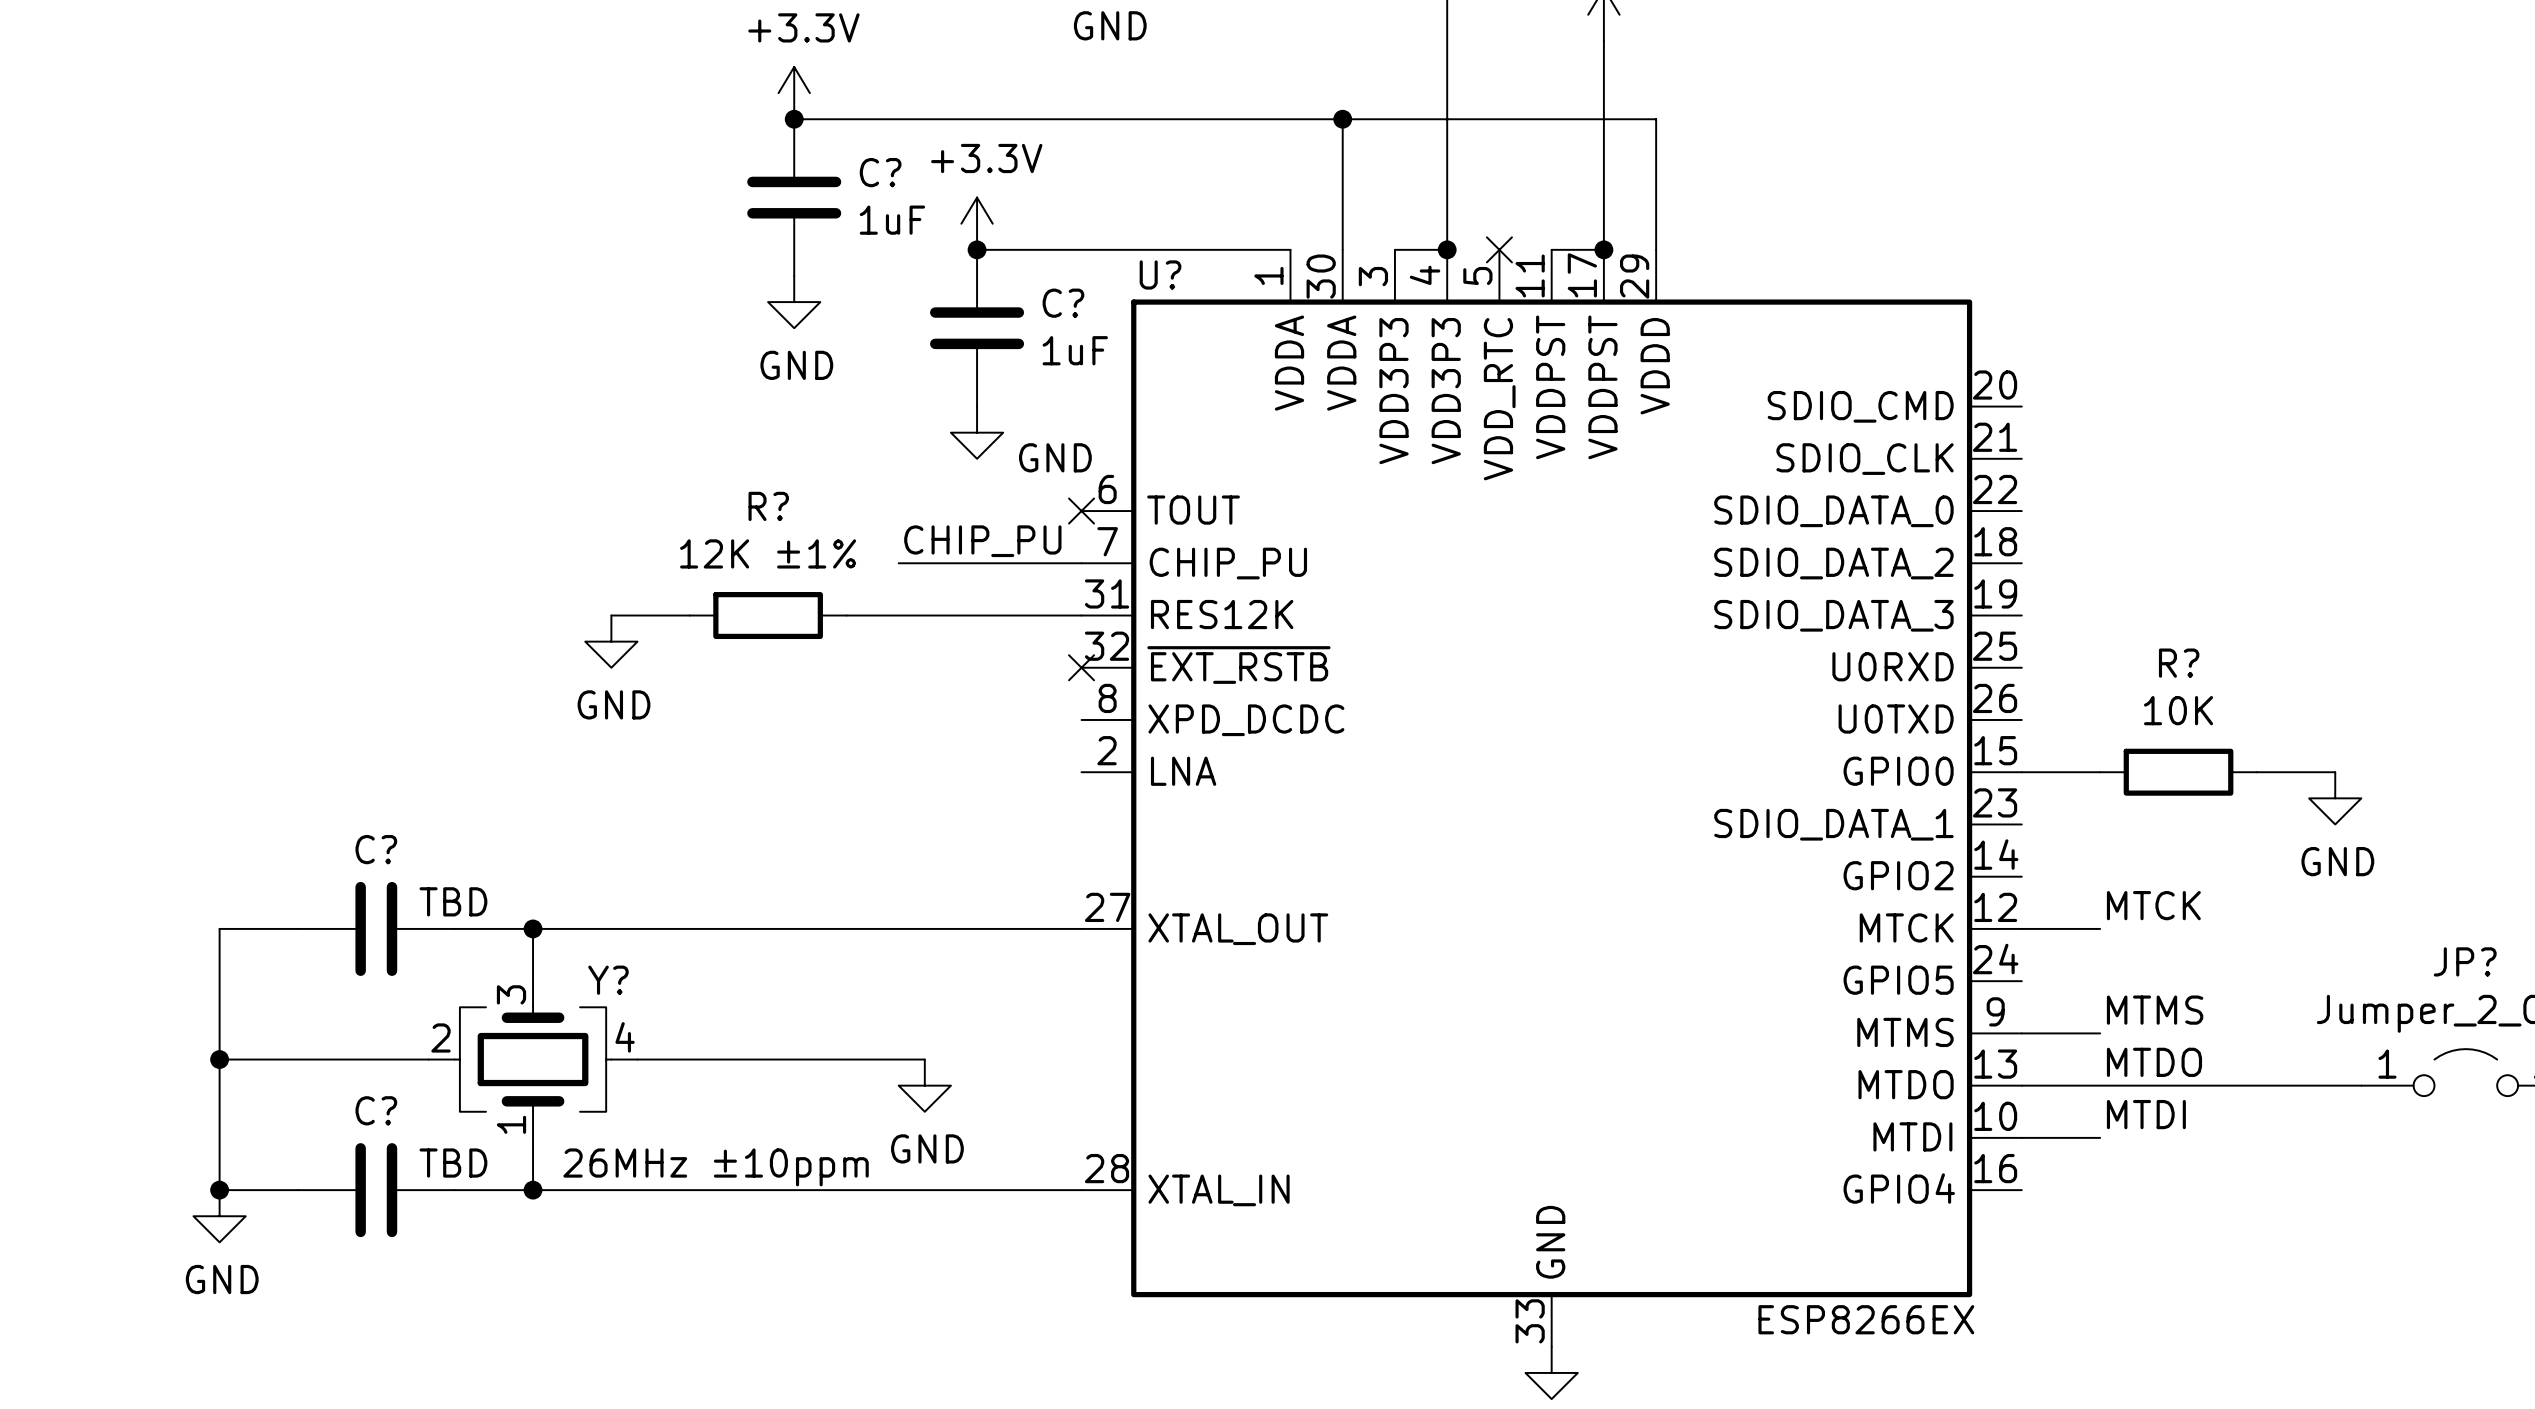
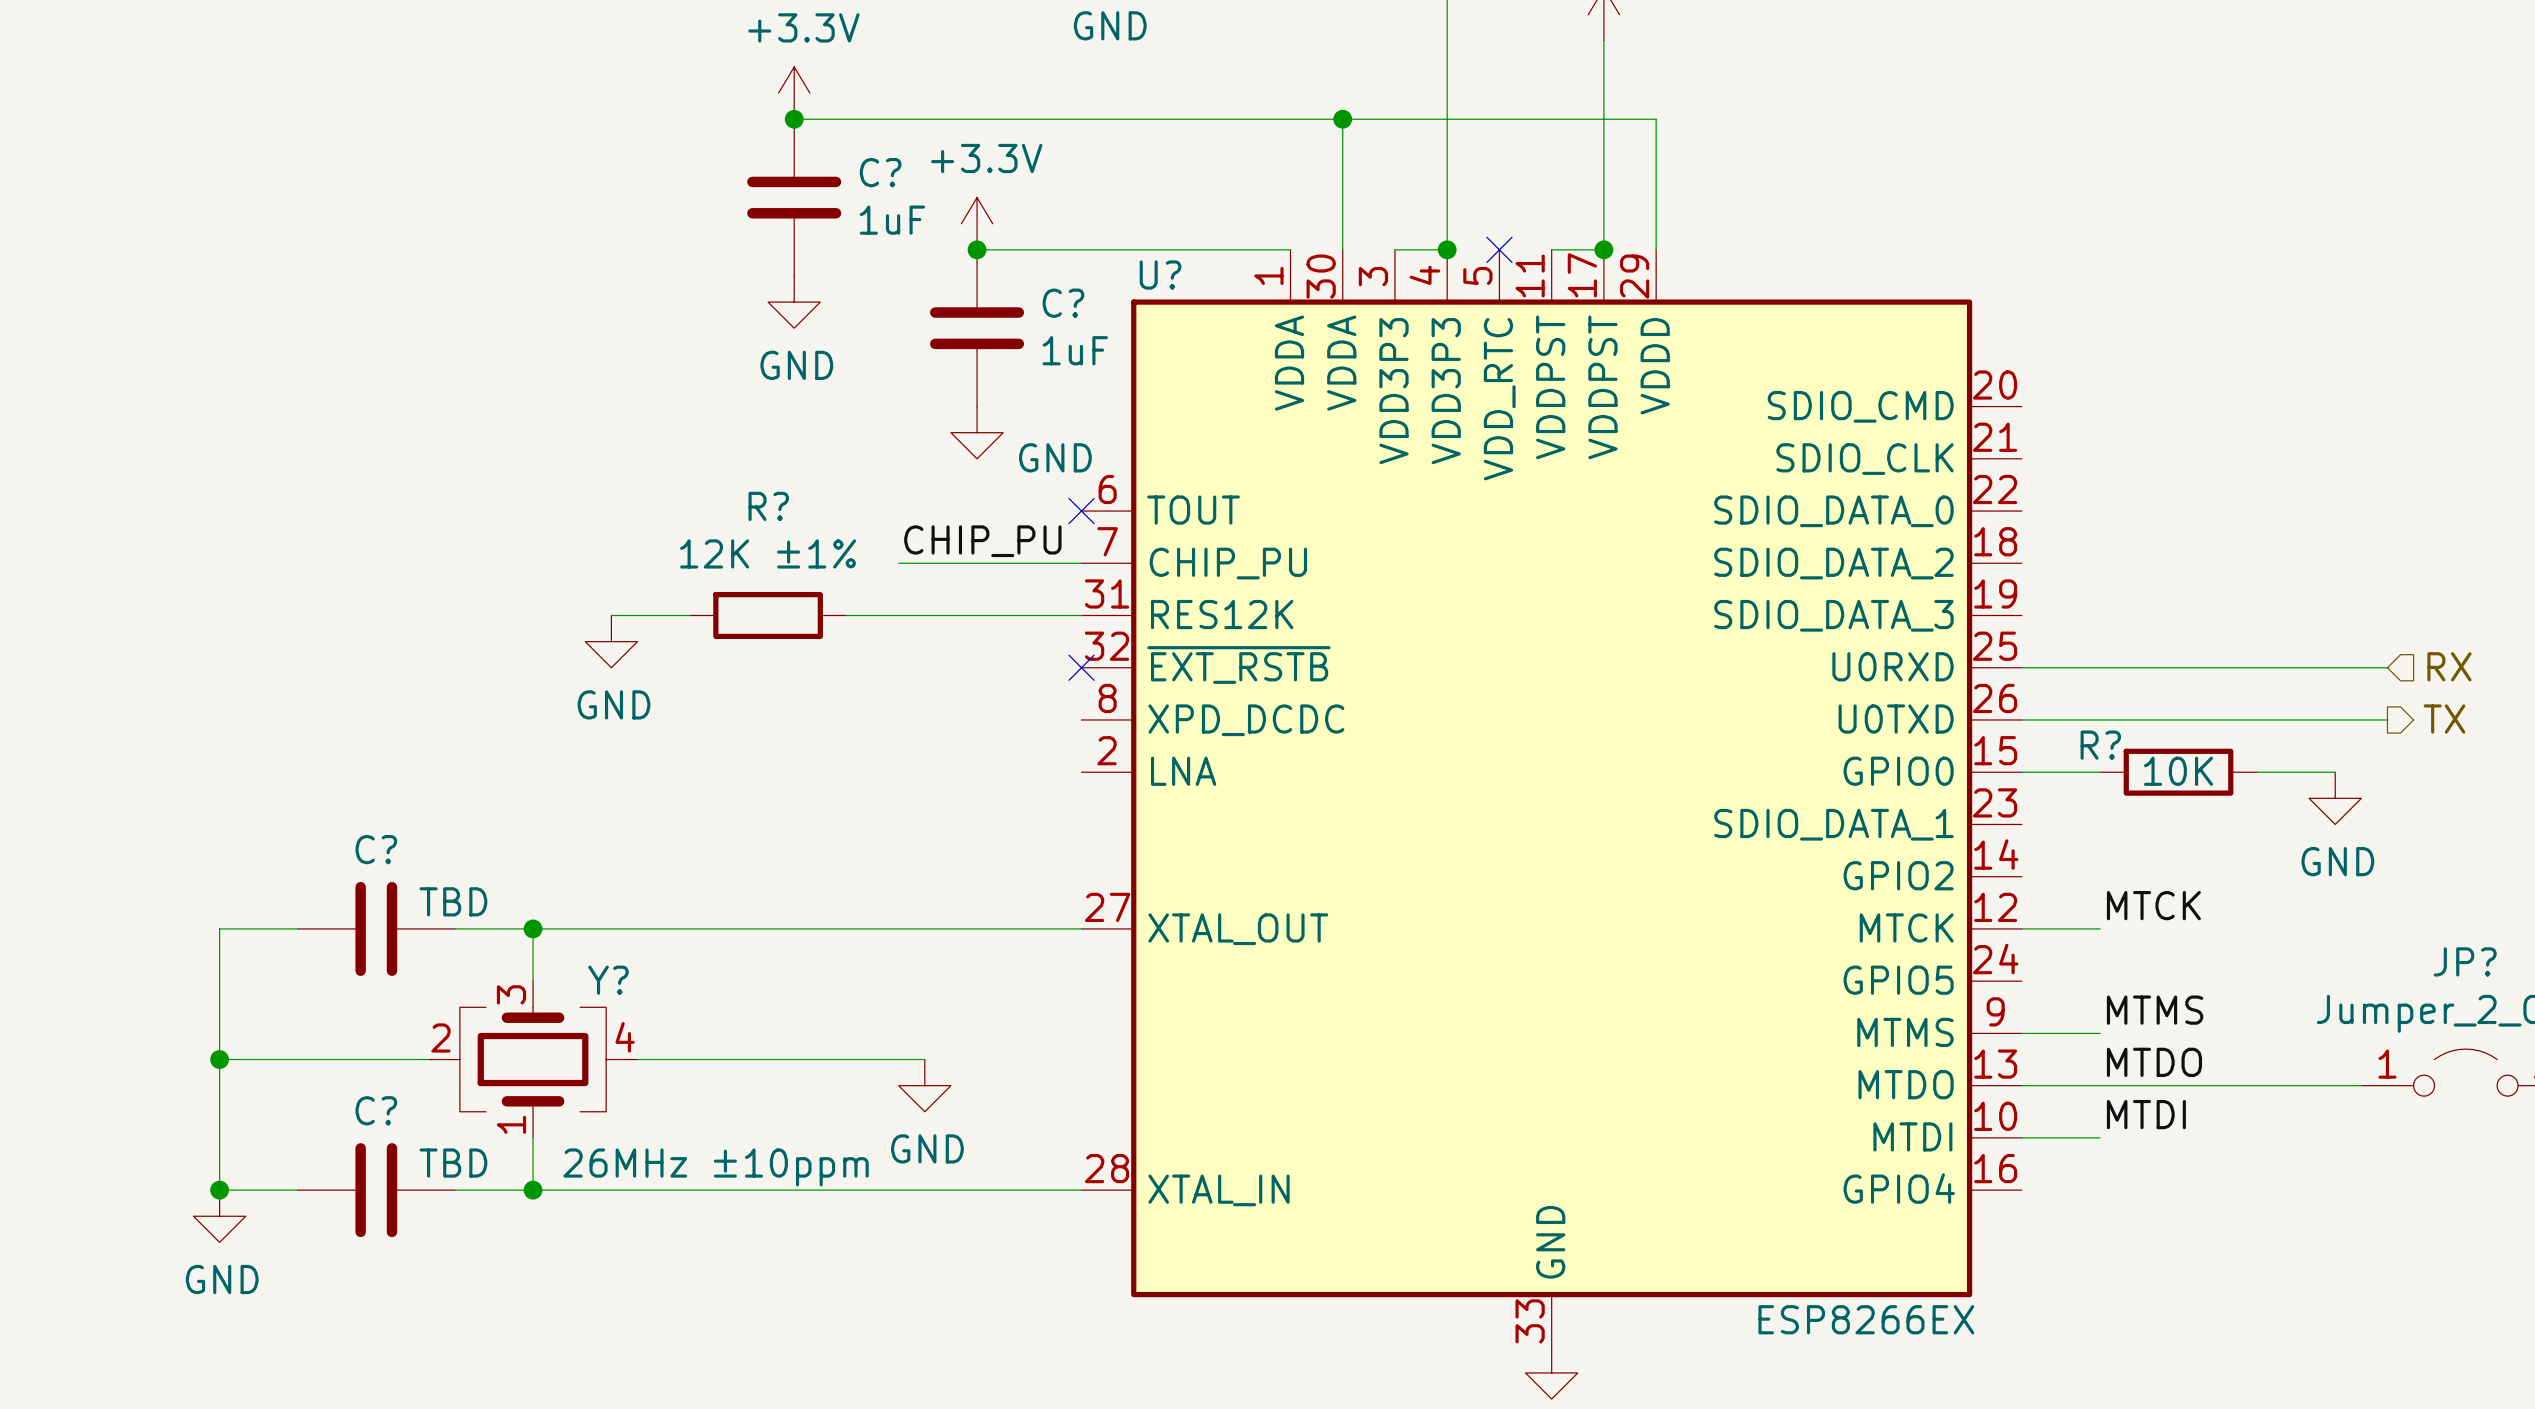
R? name position: R? (2179, 663) -> R? (2100, 745)
hierarchical label: none -> RX (2449, 666)
wire: none -> (2021, 667) (2387, 667)
R? value position: 10K (2178, 710) -> 10K (2178, 771)
wire: none -> (2021, 719) (2387, 719)
hierarchical label: none -> TX (2444, 719)

